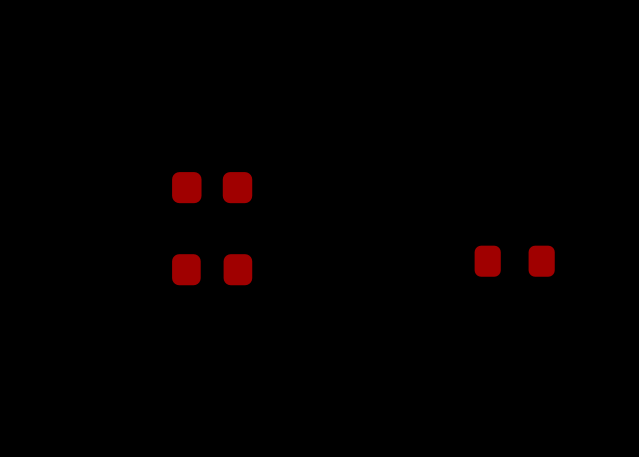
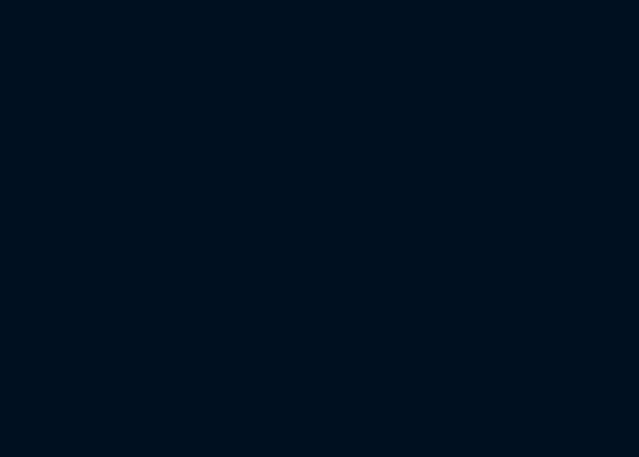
part: (212, 187) -> none
part: (514, 261) -> none
part: (212, 269) -> none

